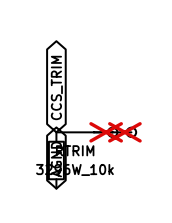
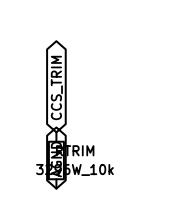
wire: (56, 132) (112, 132) -> none
part: (106, 132) -> none
part: (124, 132) -> none

